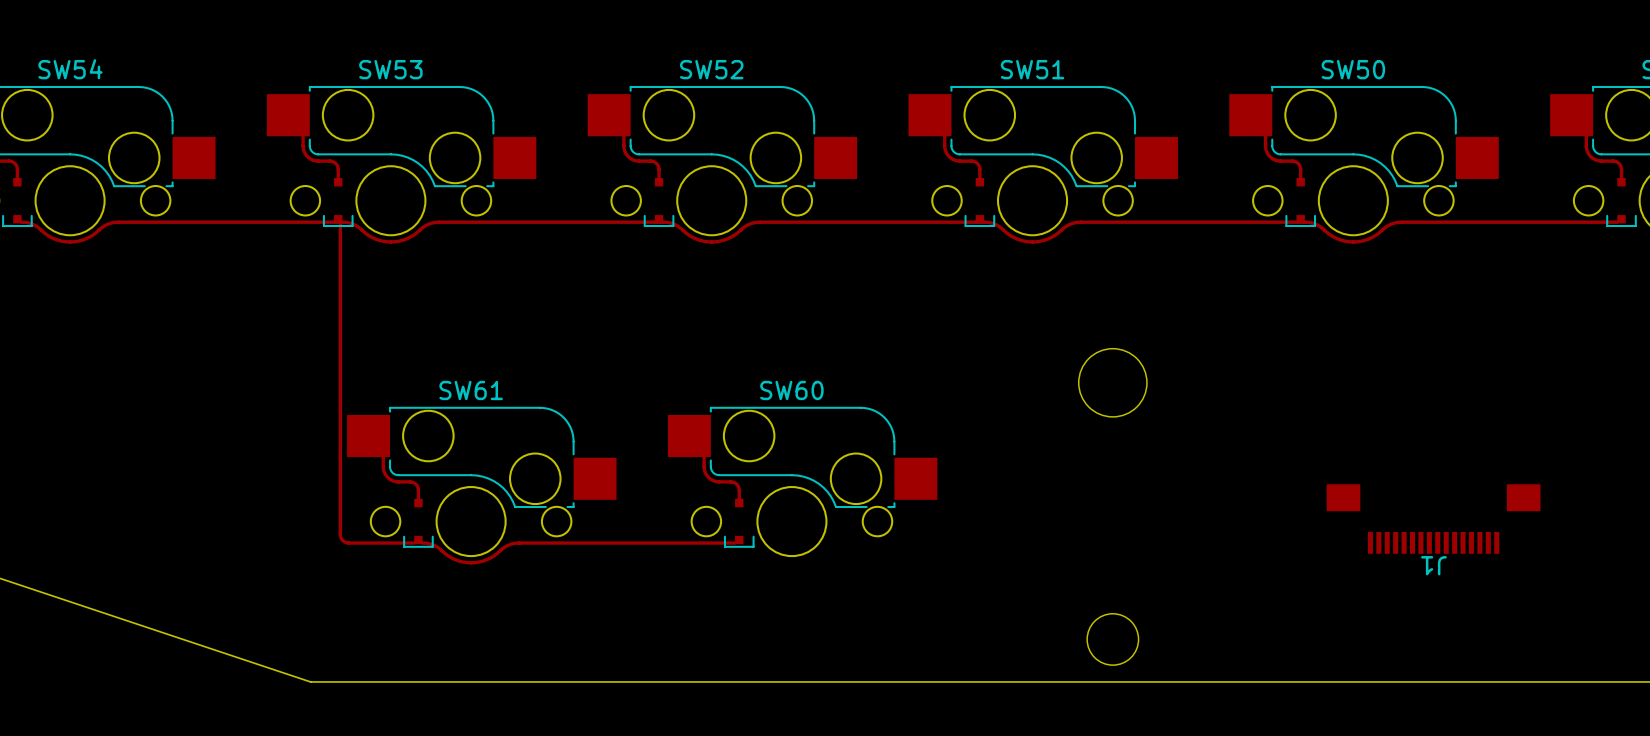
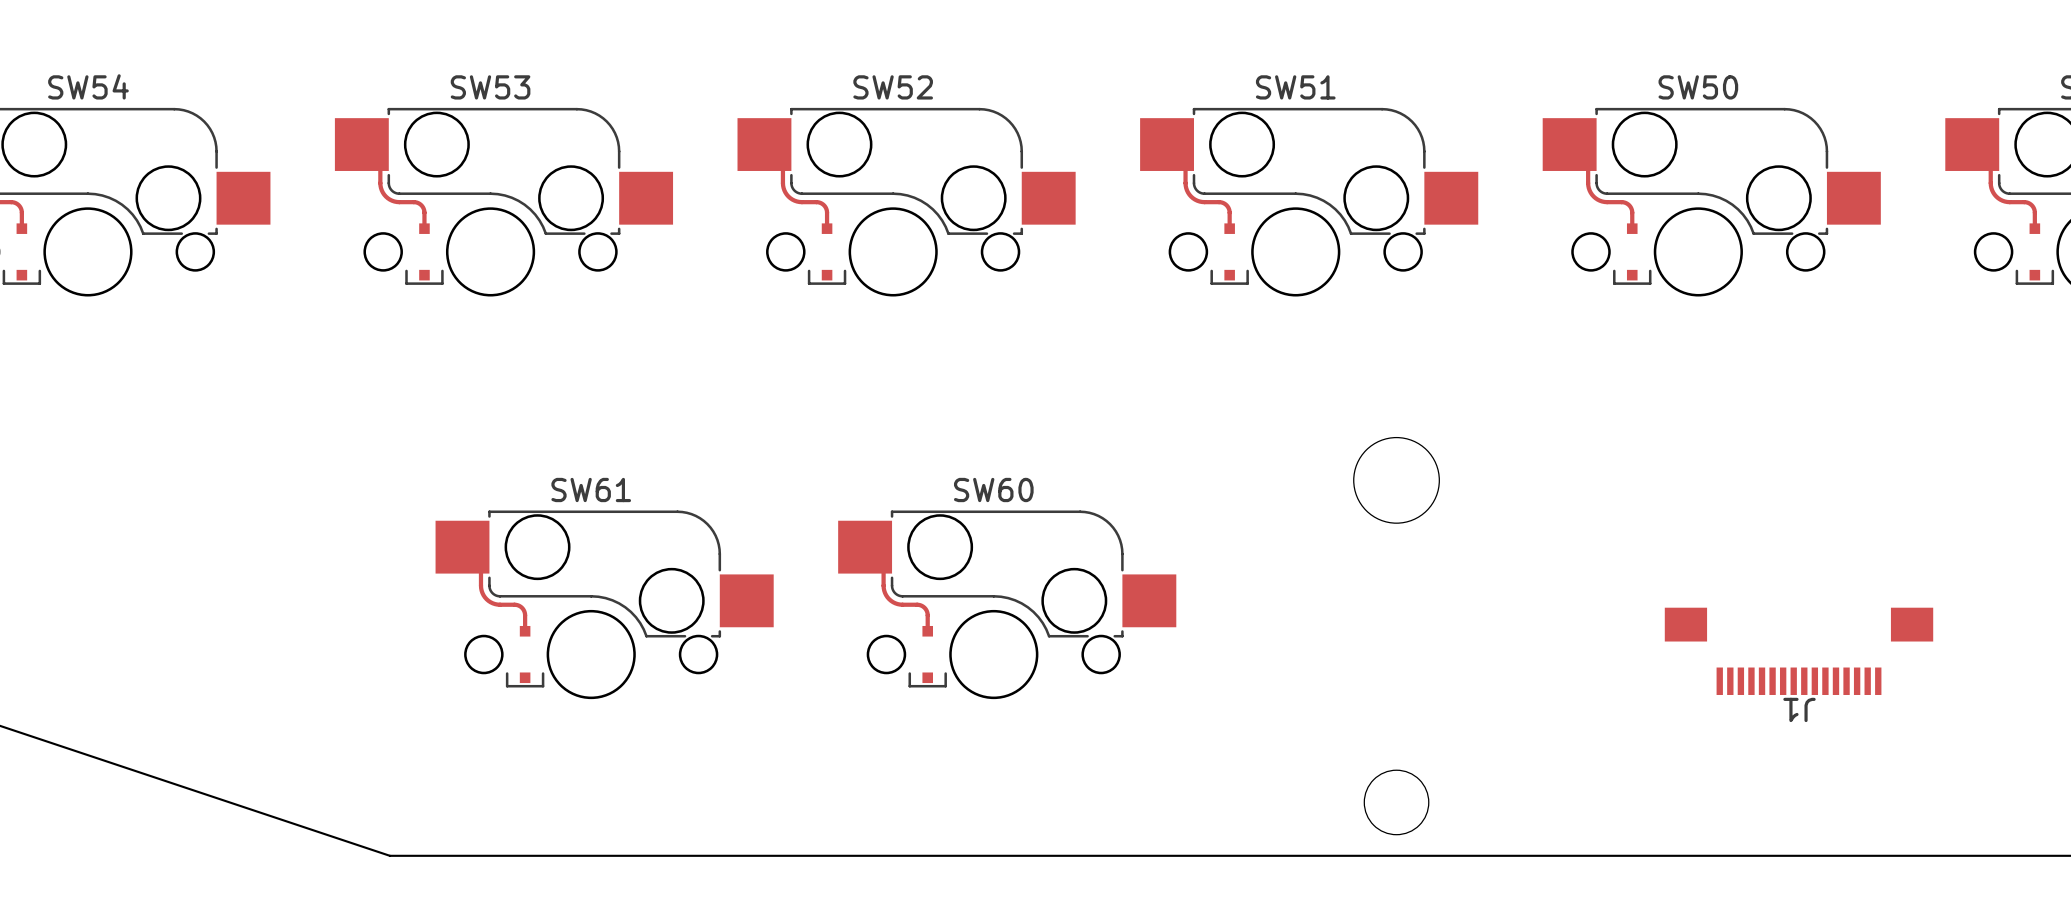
top track: (21, 222) (34, 225) (54, 238) (70, 242) (85, 238) (105, 225) (118, 222) (345, 222) (355, 225) (375, 238) (390, 242) (406, 238) (426, 225) (439, 222) (665, 222) (676, 225) (695, 238) (711, 242) (727, 238) (747, 225) (760, 222) (986, 222) (996, 225) (1016, 238) (1032, 242) (1048, 238) (1068, 225) (1078, 222) (1307, 222) (1317, 225) (1337, 238) (1353, 242) (1369, 238) (1388, 225) (1399, 222) (1617, 222) -> none
top track: (340, 222) (340, 536) (347, 542) (414, 543) -> none
top track: (422, 543) (435, 546) (455, 559) (471, 562) (486, 559) (506, 546) (516, 543) (735, 543) -> none

